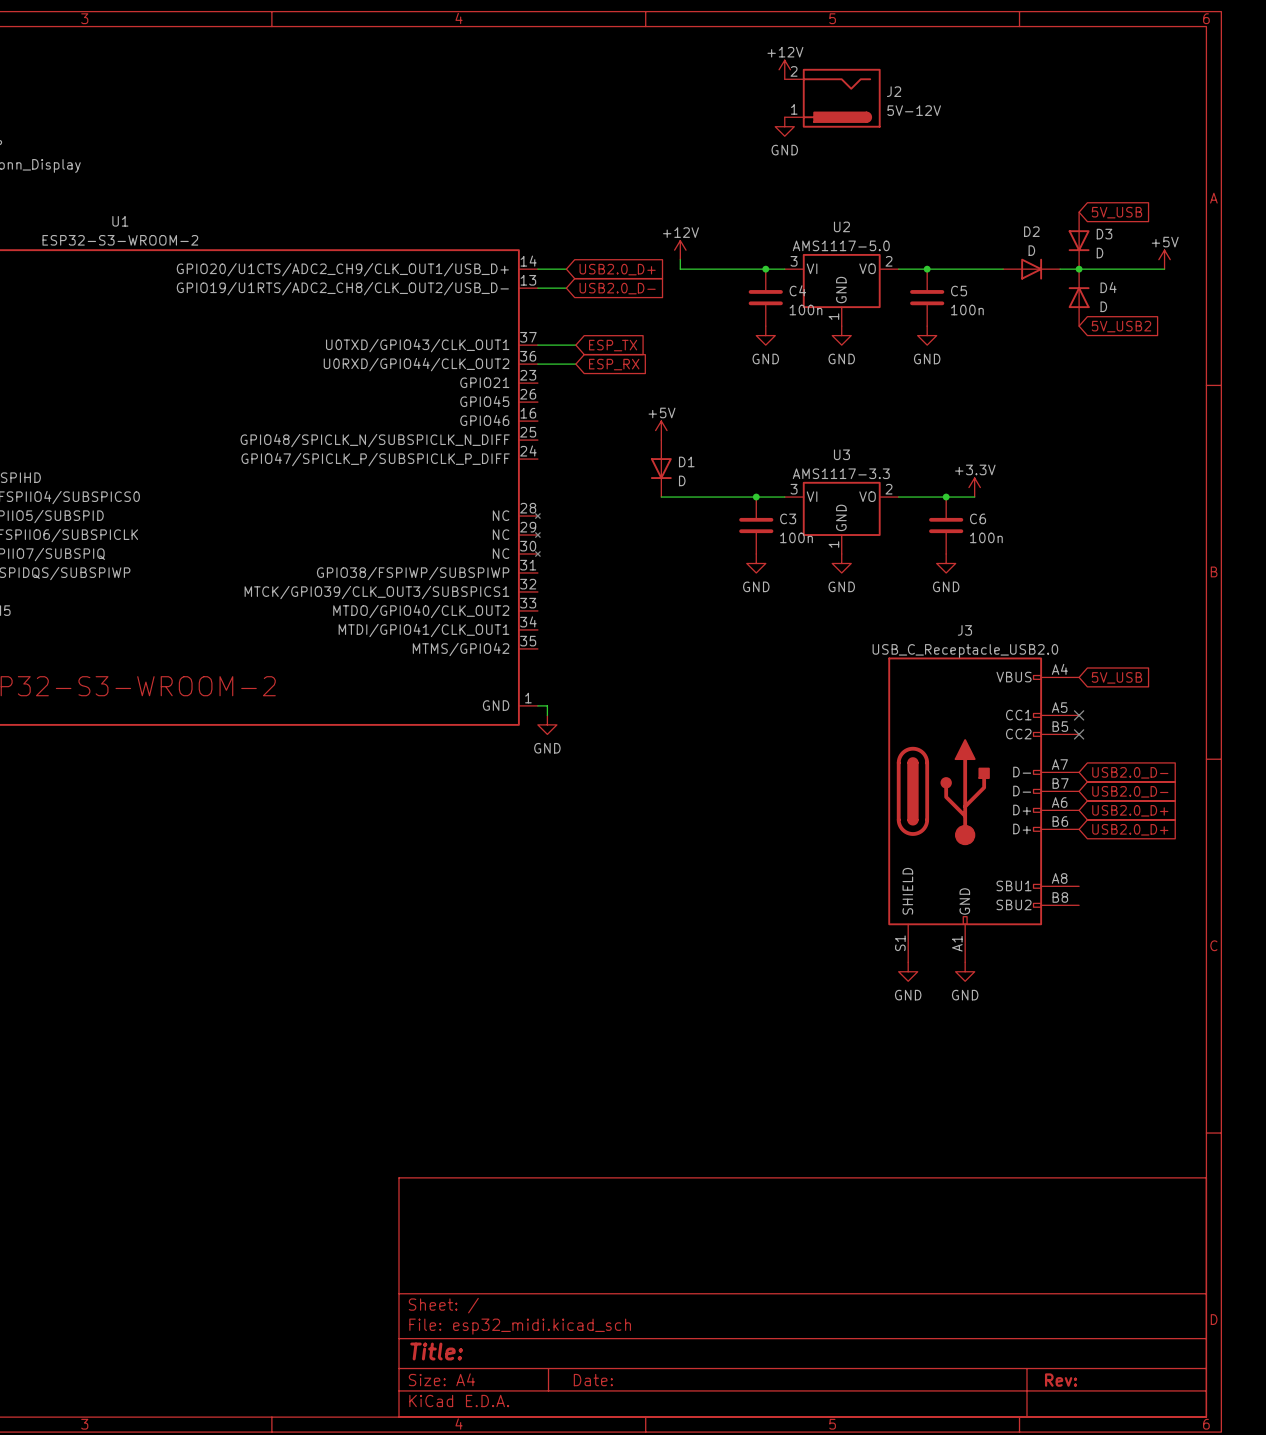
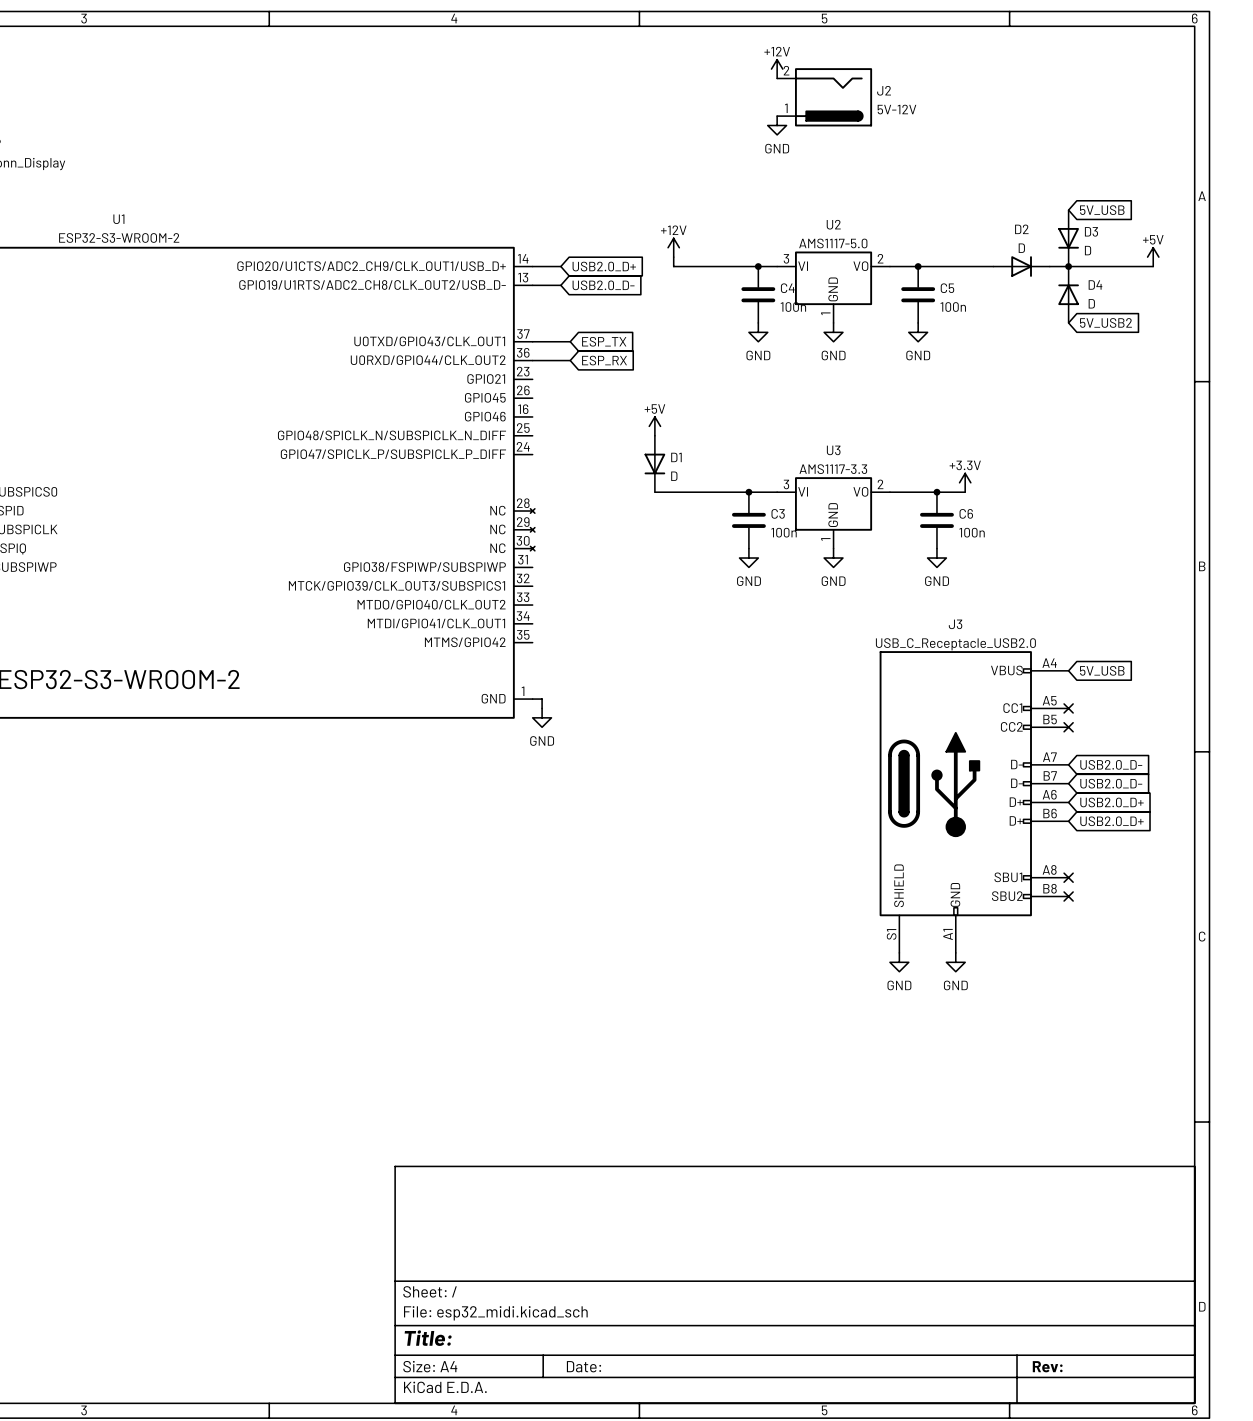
no-connect mark: none -> (1068, 877)
no-connect mark: none -> (1068, 896)

